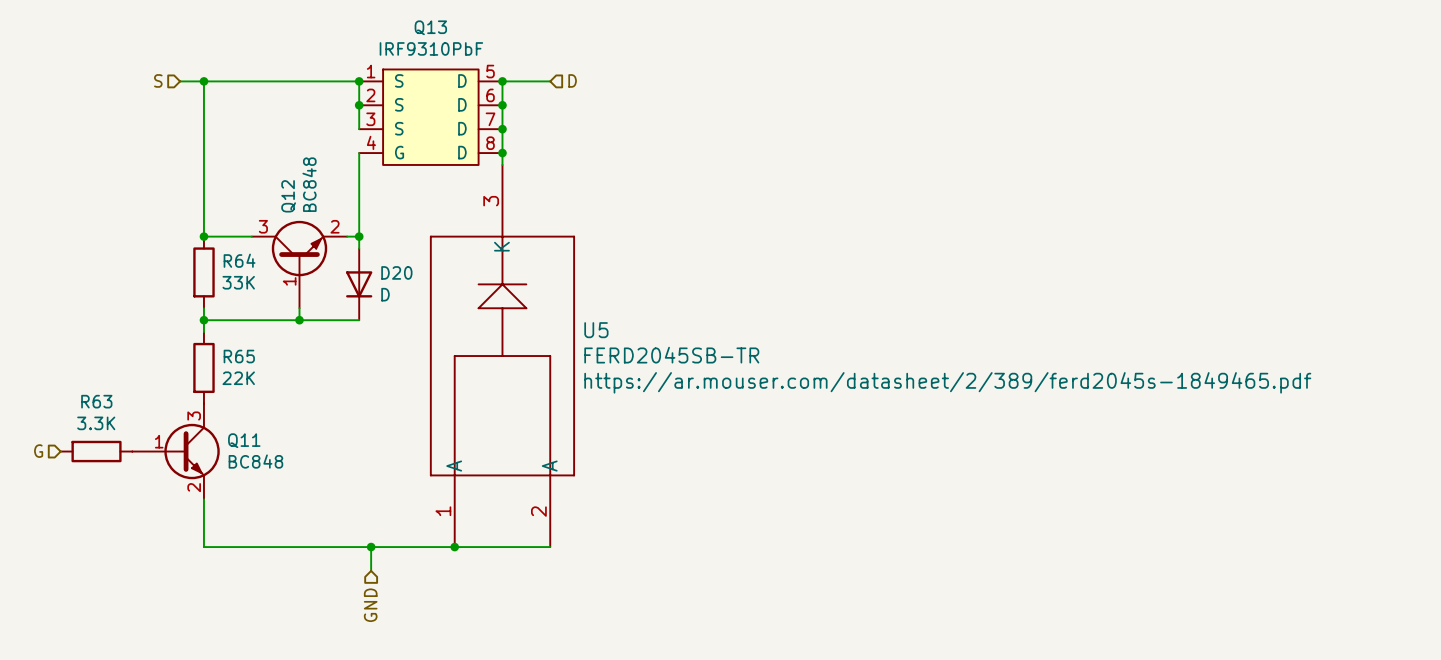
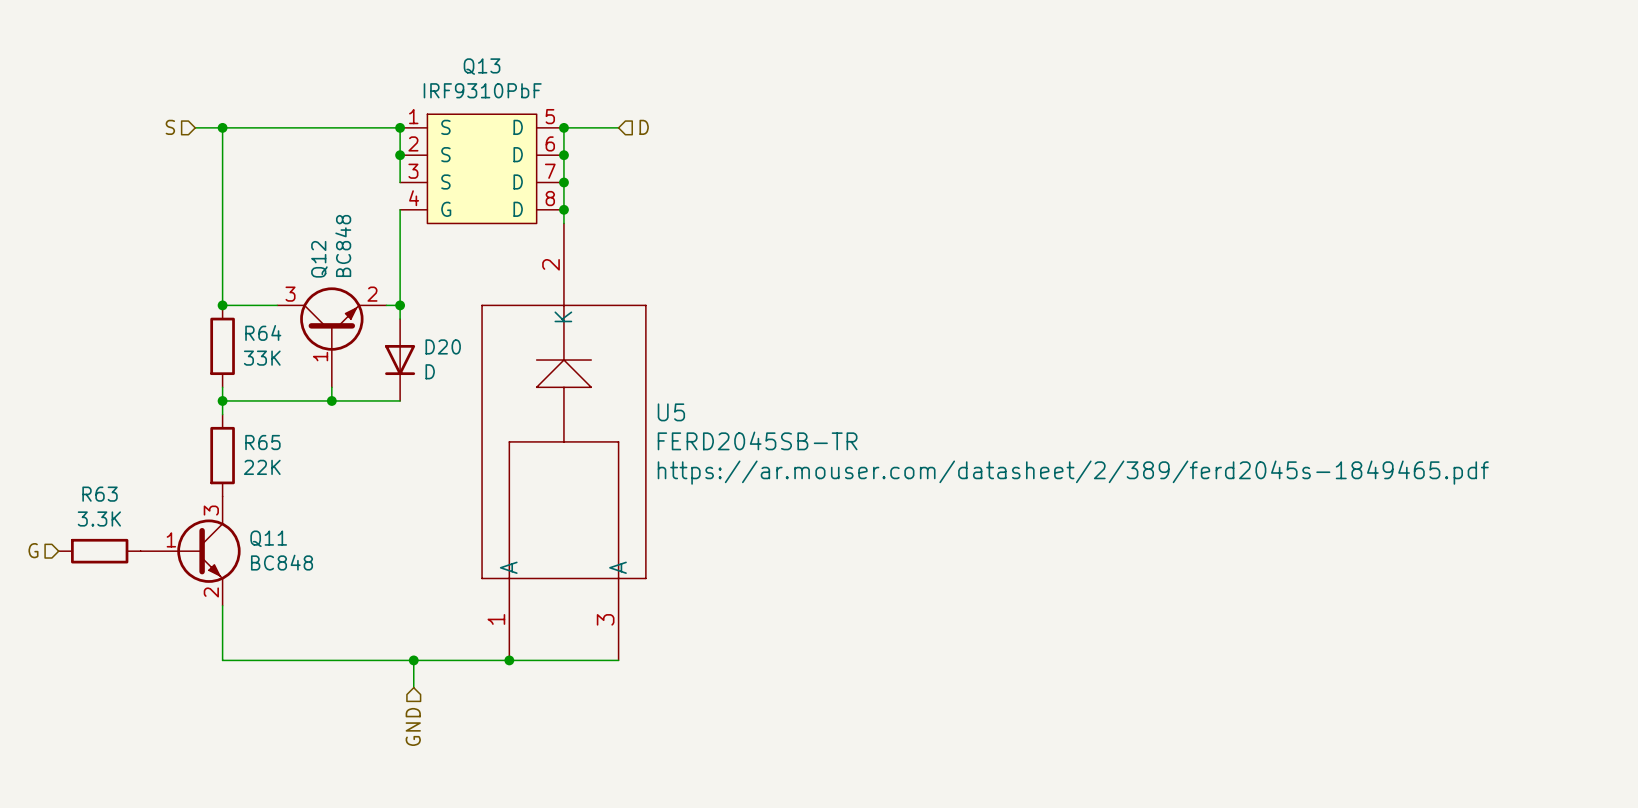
U5 pin number: 3 (491, 201) -> 2 (551, 264)
U5 pin number: 2 (538, 511) -> 3 (605, 619)

